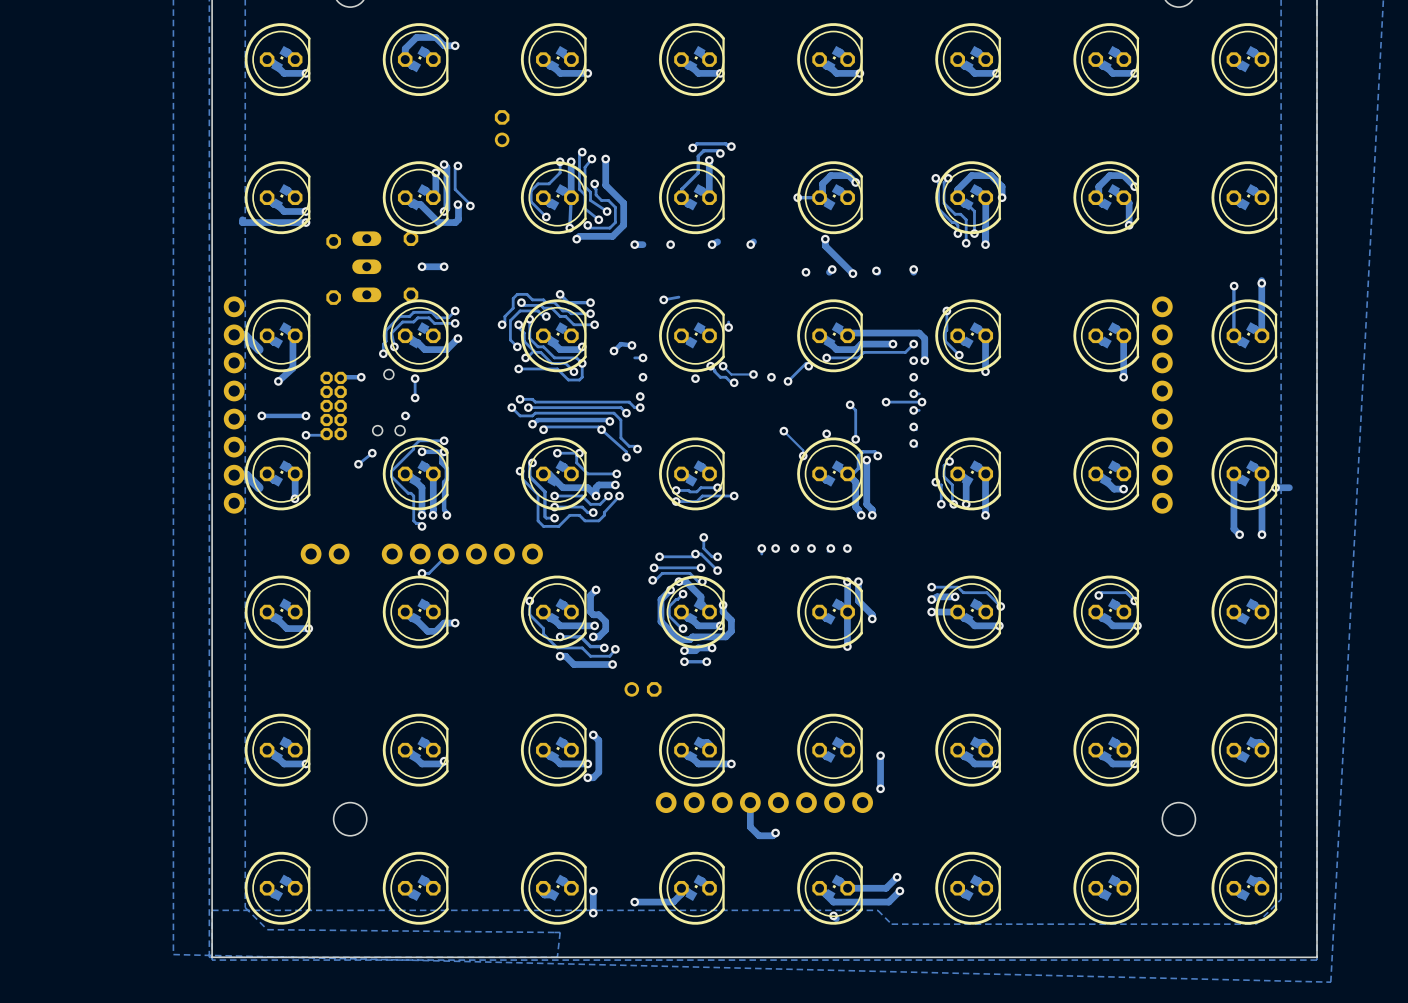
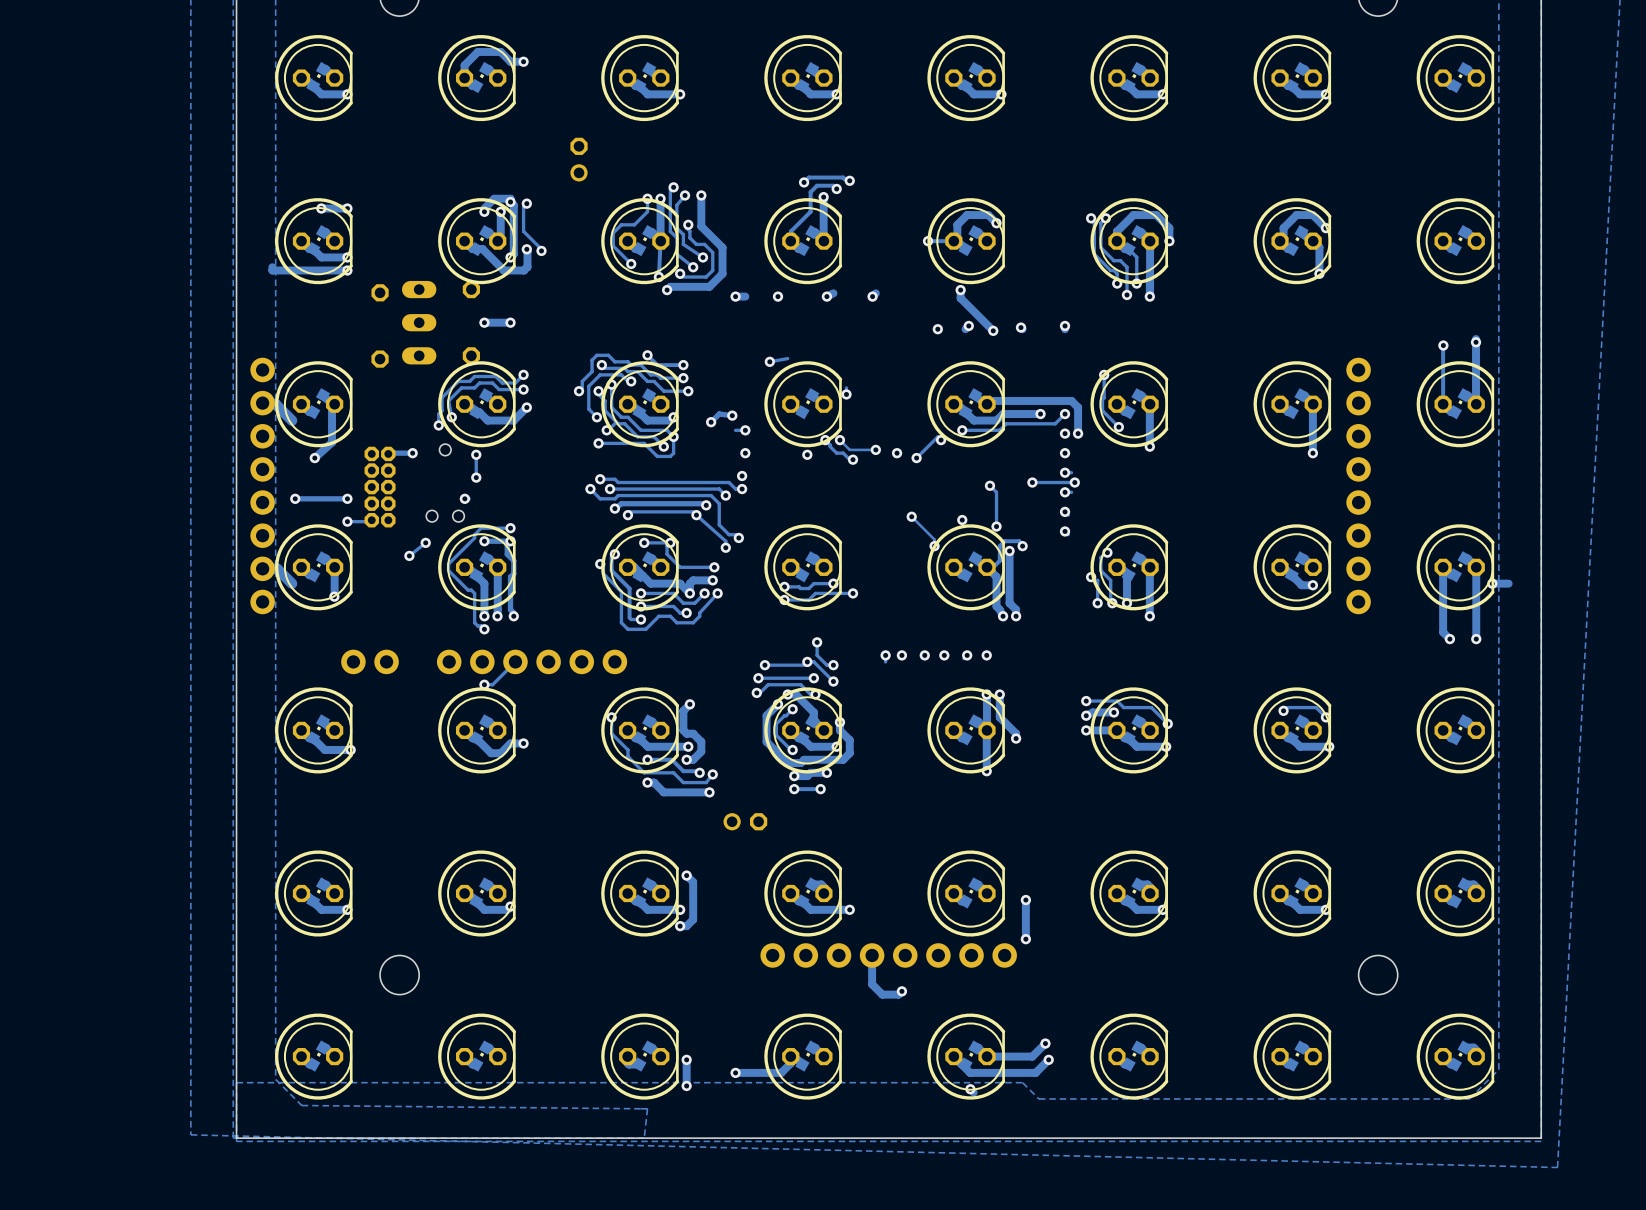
track: none -> (510, 202) (510, 198) (494, 198) (484, 208) (484, 211)
via: none -> (321, 208)
track: none -> (347, 208) (321, 208)
via: none -> (347, 208)
via: none -> (484, 211)

